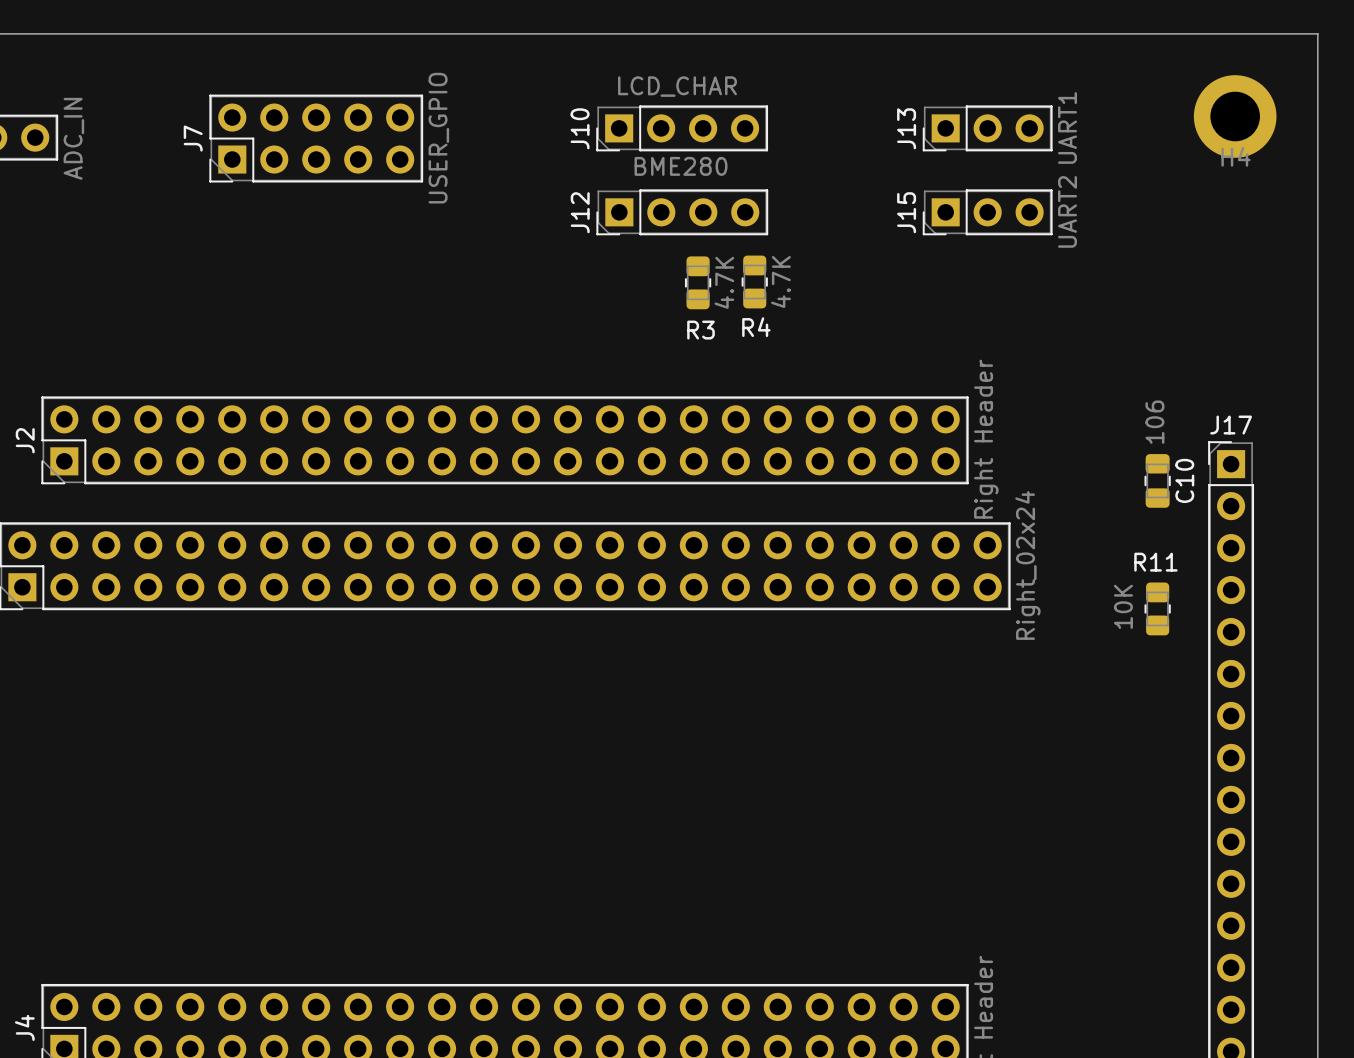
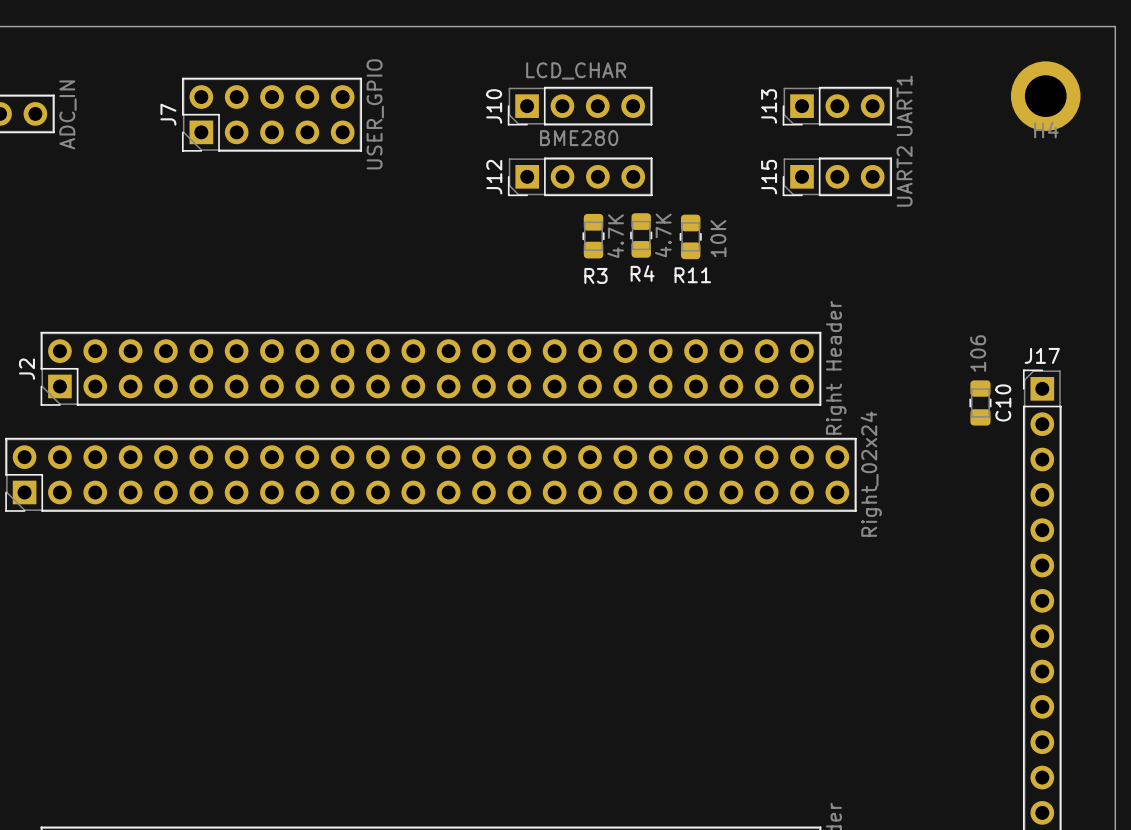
R11 name position: R11 (1155, 562) -> R11 (692, 275)
R11 value position: 10K (1123, 606) -> 10K (718, 238)
R11 position: (1157, 608) -> (690, 236)

